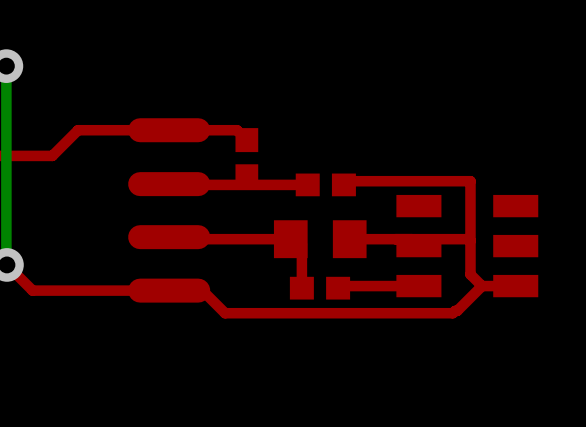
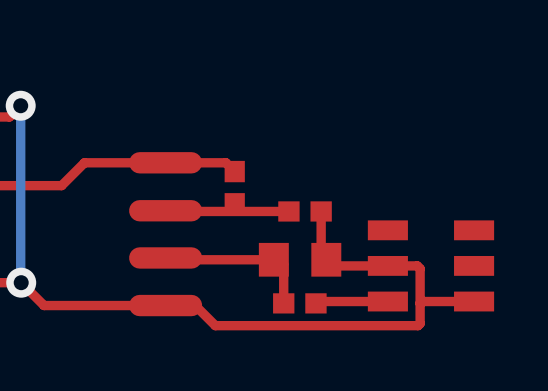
top track: (343, 184) (347, 181) (470, 181) (470, 274) (482, 286) (455, 310) -> (326, 265) (417, 265) (420, 268) (420, 323)
top track: none -> (321, 211) (321, 259)
top track: (470, 240) (468, 239) (349, 239) (356, 246) -> none
top track: none -> (444, 301) (421, 301) (420, 303)

